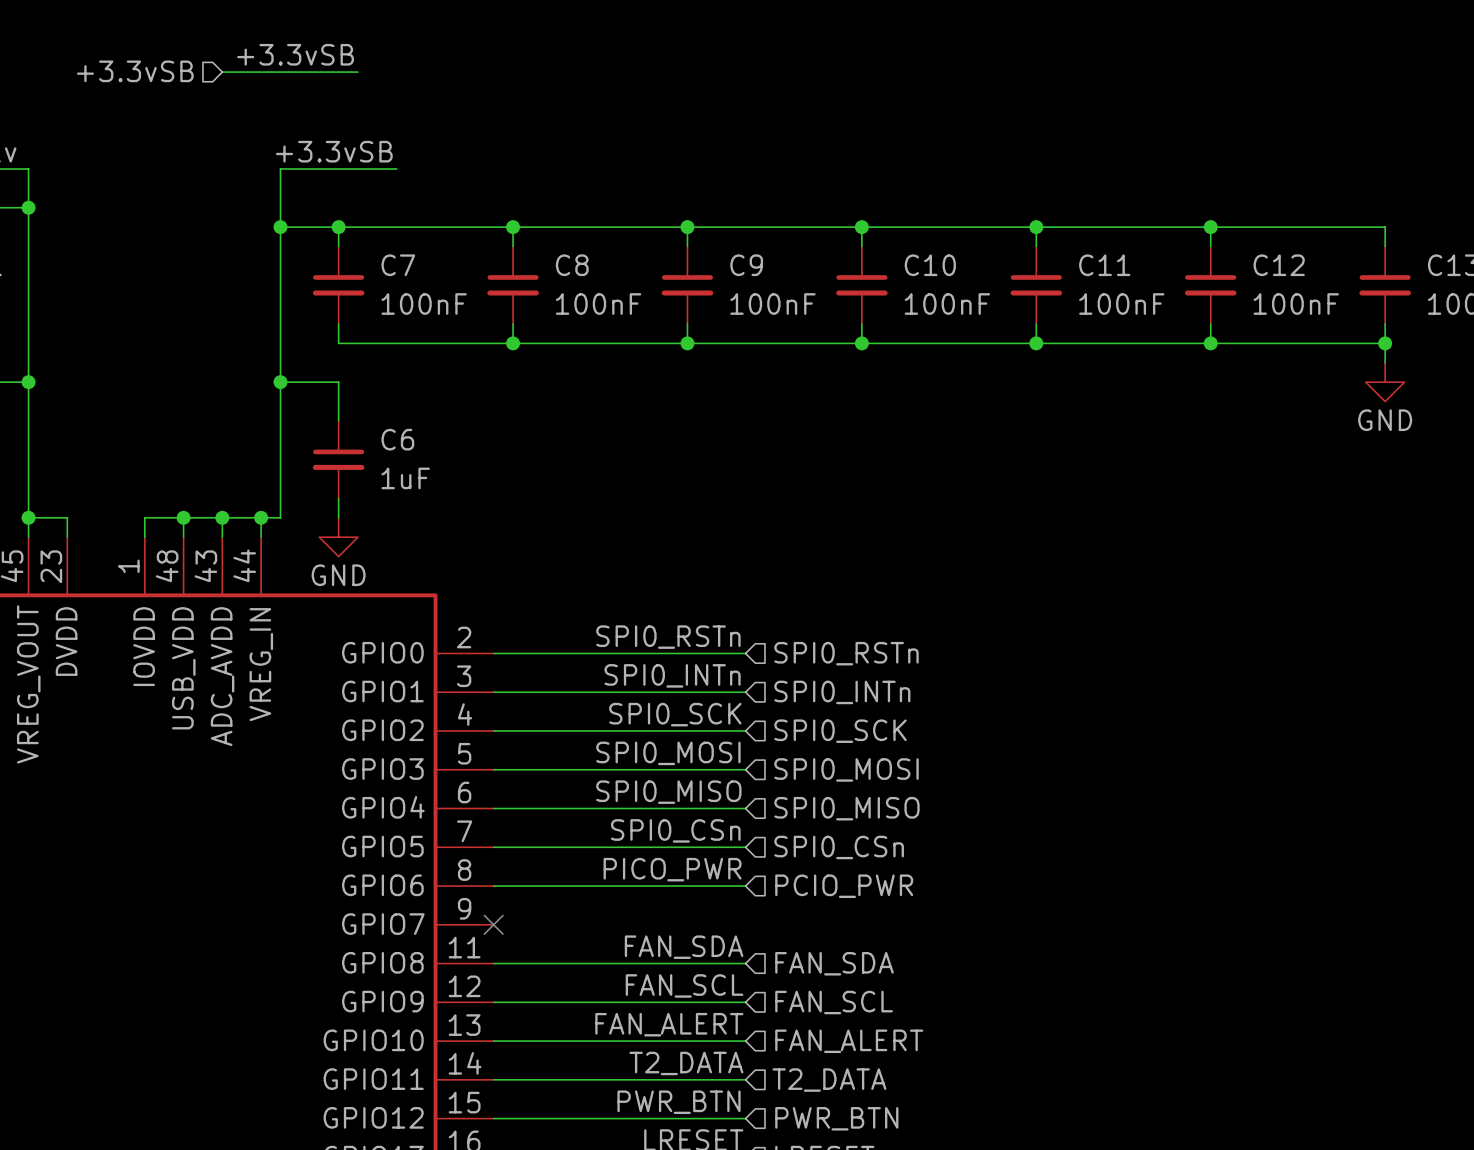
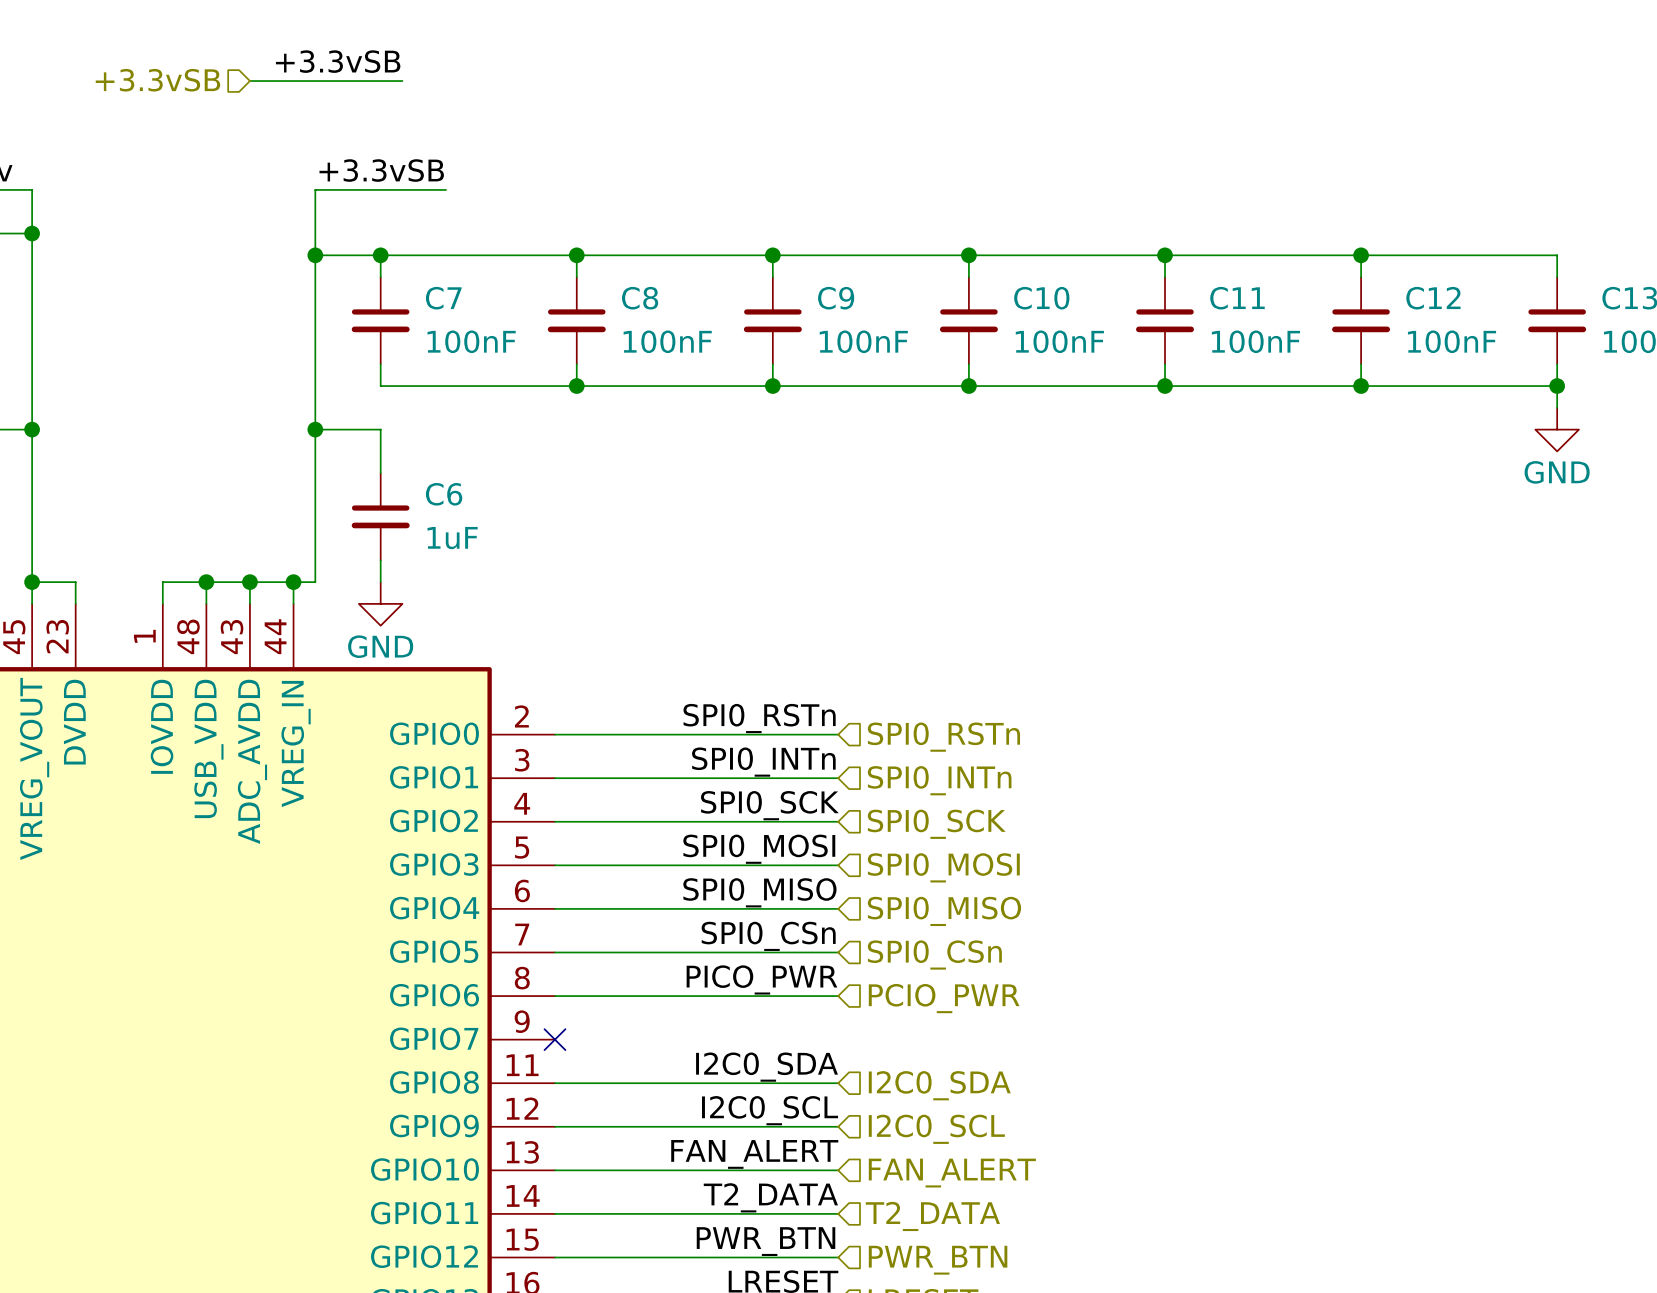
label: FAN_SDA (684, 947) -> I2C0_SDA (767, 1067)
hierarchical label: FAN_SDA (834, 963) -> I2C0_SDA (939, 1085)
label: FAN_SCL (684, 985) -> I2C0_SCL (770, 1110)
hierarchical label: FAN_SCL (834, 1002) -> I2C0_SCL (936, 1129)

